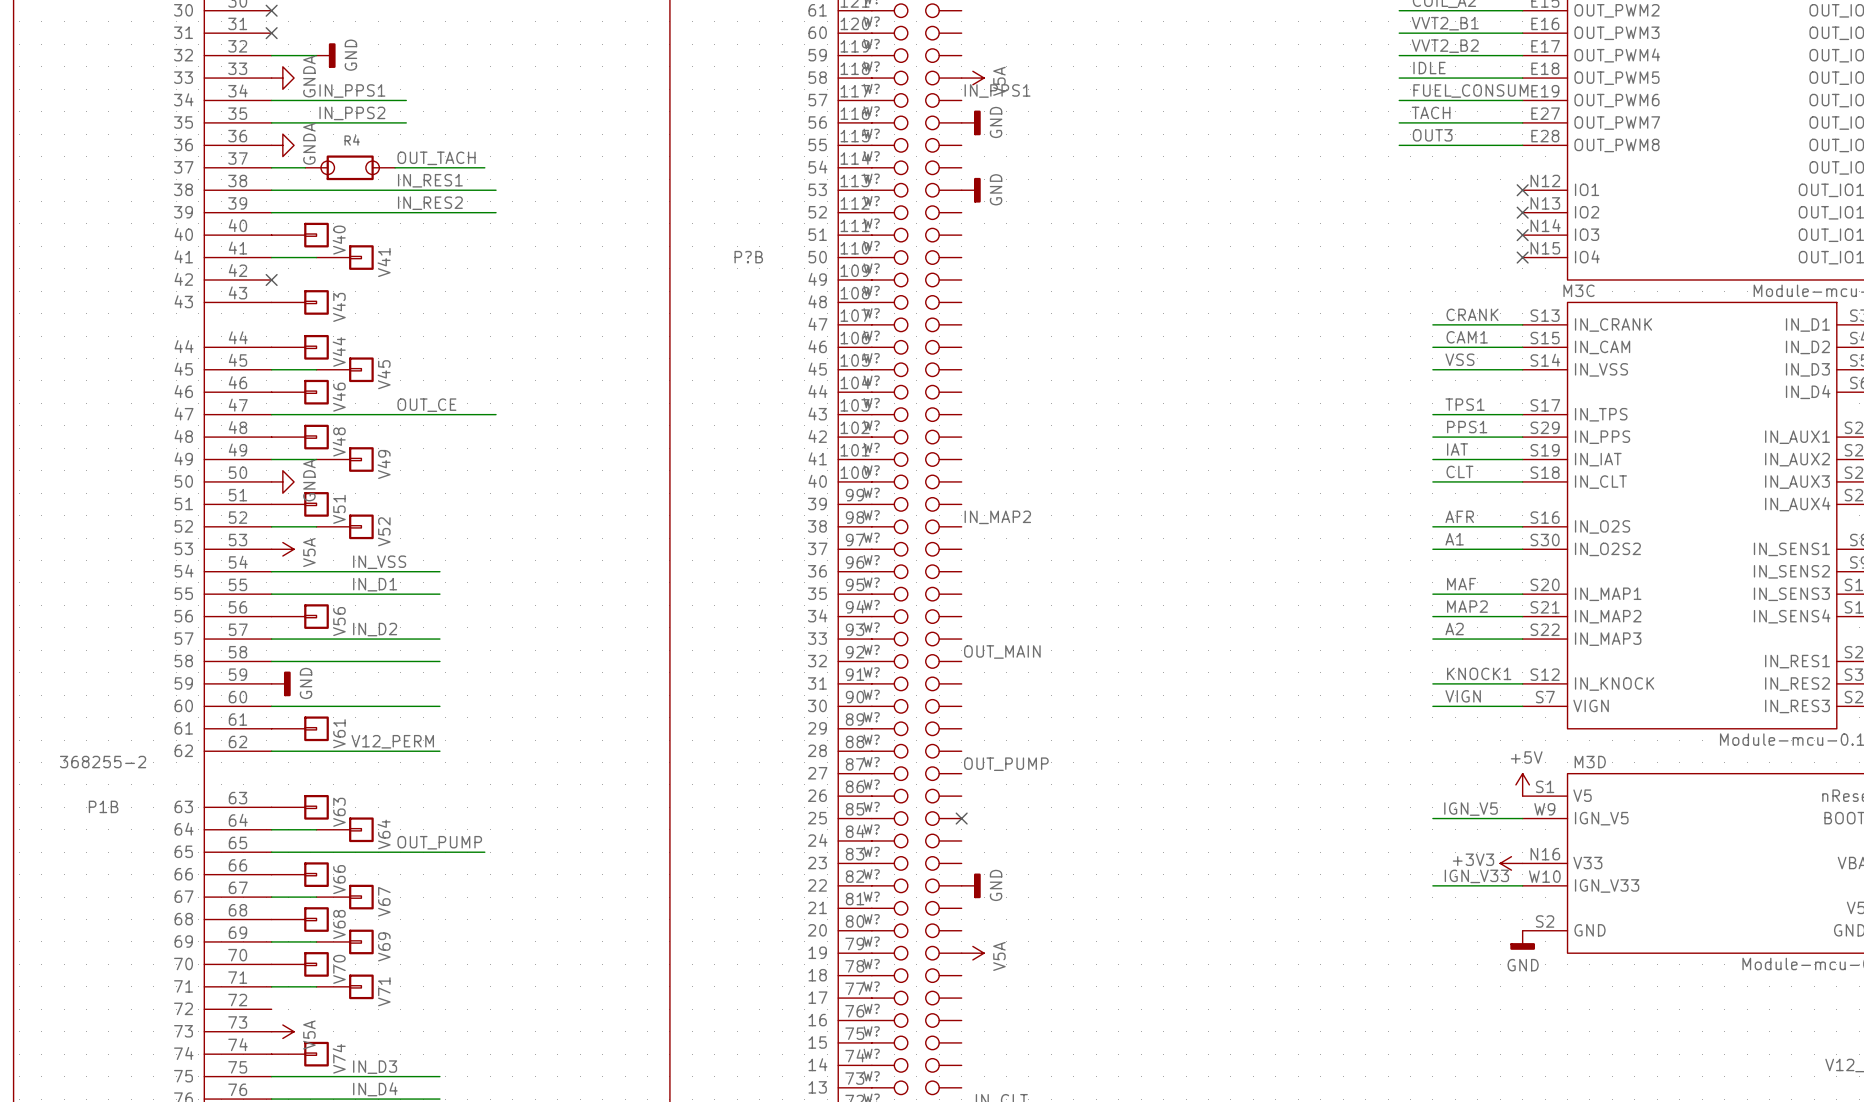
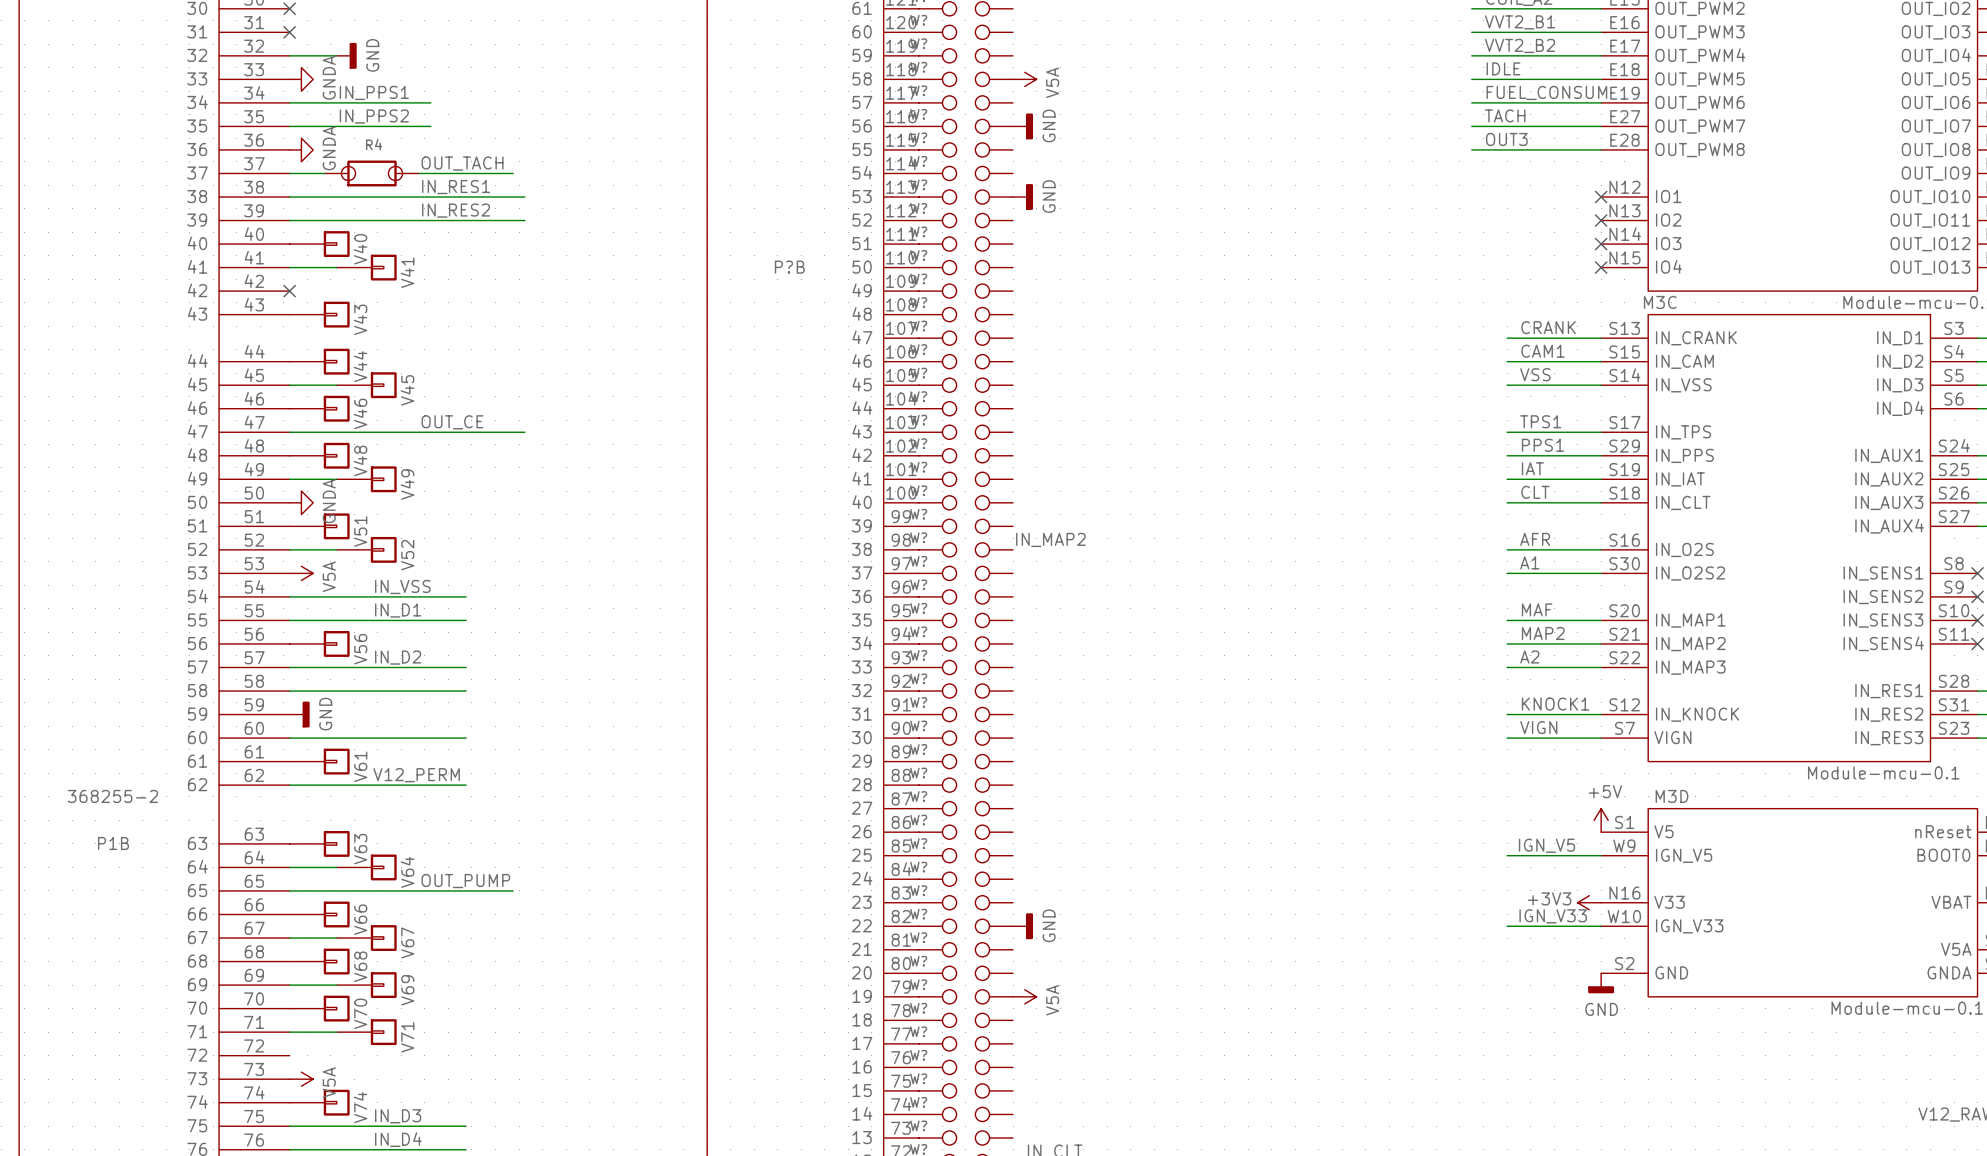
label: IN_PPS1 (997, 91) -> none
label: OUT_MAIN (1002, 651) -> none
label: OUT_PUMP (1006, 764) -> none
no-connect mark: (961, 818) -> none

